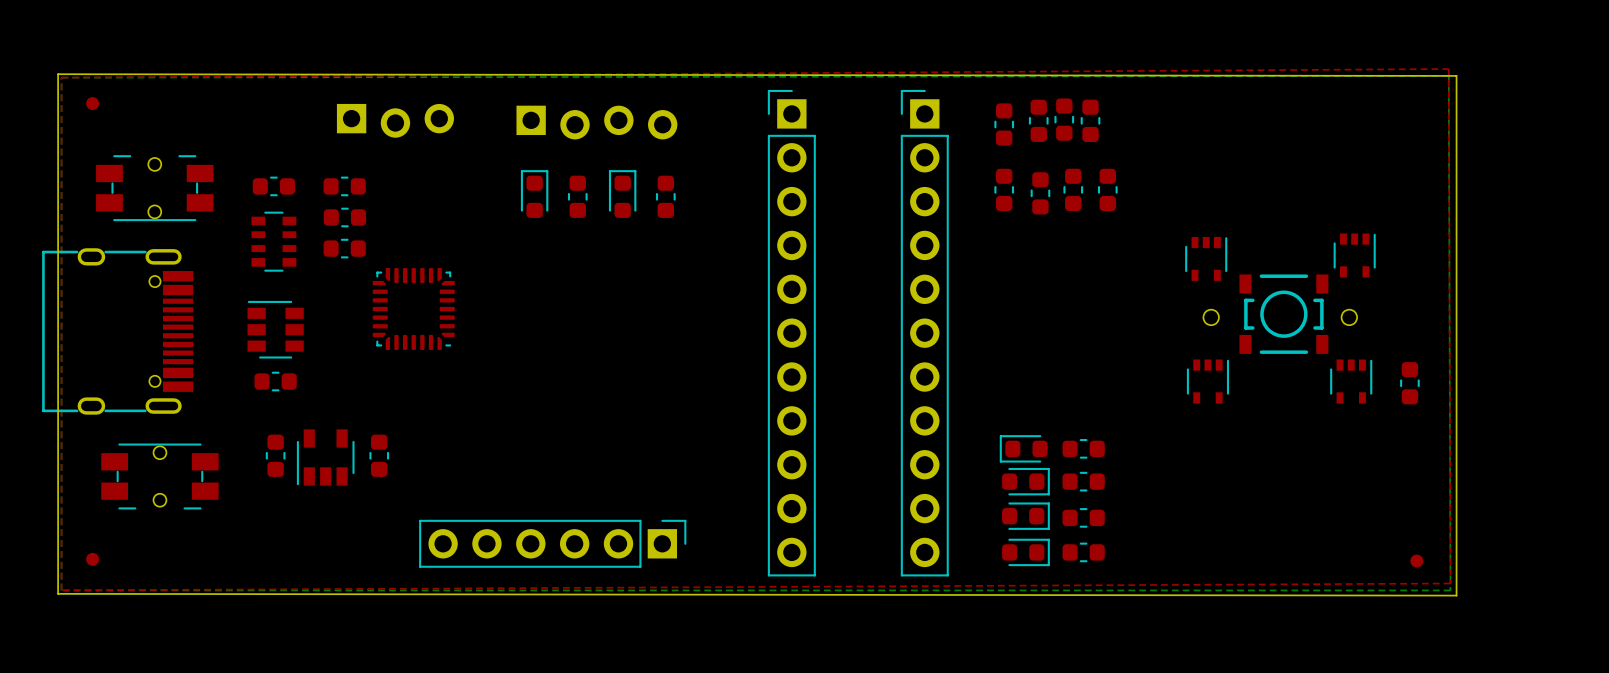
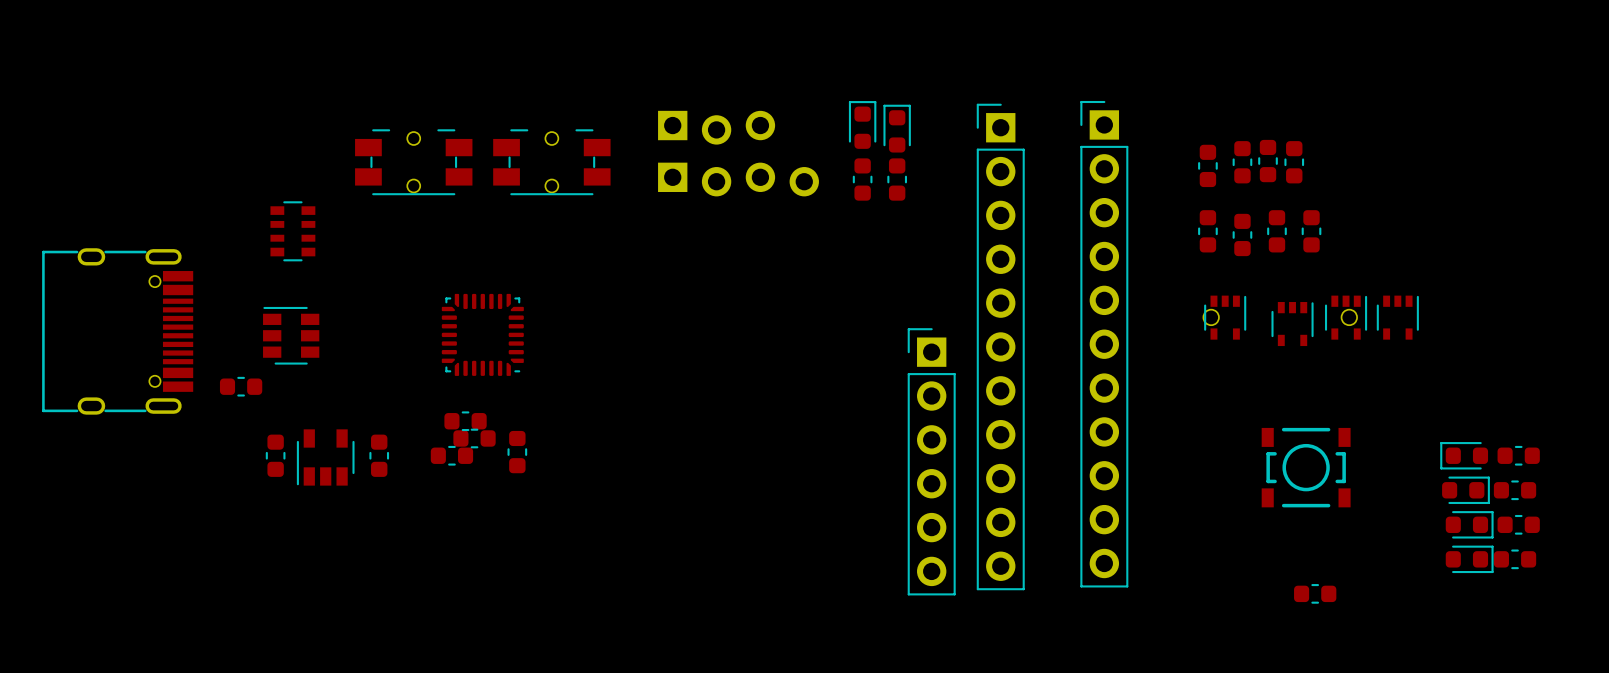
top zone outline: (1448, 69) (61, 77) (61, 590) (1450, 583) (1448, 69) -> none
board edge: (58, 74) (1456, 75) (1456, 595) (58, 593) (58, 74) -> none
bottom zone outline: (1448, 75) (61, 77) (61, 590) (1450, 590) (1448, 75) -> none
part: (92, 103) -> none
part: (1064, 119) -> none
part position: (395, 120) -> (716, 127)
part: (1038, 120) -> none
part: (1090, 120) -> none
part position: (596, 122) -> (738, 179)
part: none -> (862, 124)
part: (1004, 124) -> none
part: none -> (897, 128)
part: none -> (1268, 161)
part: none -> (413, 162)
part: none -> (551, 162)
part: none -> (1242, 162)
part: none -> (1294, 162)
part: none -> (1207, 165)
part: none -> (862, 179)
part: none -> (897, 179)
part: (273, 186) -> none
part: (344, 186) -> none
part: (154, 188) -> none
part: (1004, 189) -> none
part: (1073, 189) -> none
part: (1107, 189) -> none
part: (1040, 193) -> none
part: (534, 194) -> none
part: (622, 194) -> none
part: (577, 196) -> none
part: (665, 196) -> none
part: (344, 217) -> none
part: none -> (1207, 231)
part: none -> (1276, 231)
part: none -> (1311, 231)
part: none -> (1242, 234)
part position: (273, 241) -> (292, 231)
part: (344, 248) -> none
part: (1354, 255) -> none
part: (1206, 258) -> none
part footprint: [1239, 274, 1329, 354] -> [1271, 302, 1314, 347]
part position: (413, 309) -> (482, 334)
part: none -> (1225, 317)
part: none -> (1346, 317)
part: none -> (1397, 317)
part position: (275, 329) -> (291, 335)
part: (791, 333) -> none
part position: (924, 333) -> (1000, 346)
part: none -> (1104, 344)
part position: (275, 381) -> (241, 386)
part: (1207, 381) -> none
part: (1351, 381) -> none
part: (1409, 383) -> none
part: none -> (465, 421)
part: none -> (474, 438)
part: (1023, 448) -> none
part: (1083, 448) -> none
part: none -> (517, 452)
part: none -> (451, 455)
part: none -> (1464, 455)
part: none -> (1518, 455)
part: none -> (1306, 467)
part: (159, 476) -> none
part: (1025, 481) -> none
part: (1083, 481) -> none
part: none -> (1465, 490)
part: none -> (1515, 490)
part: (1025, 516) -> none
part: (1083, 517) -> none
part: none -> (1469, 524)
part: none -> (1518, 524)
part rotation: 0° (552, 543) -> 90° counterclockwise (931, 461)
part position: (552, 543) -> (931, 461)
part: (1025, 552) -> none
part: (1083, 552) -> none
part: (92, 559) -> none
part: none -> (1469, 559)
part: none -> (1515, 559)
part: (1416, 561) -> none
part: none -> (1315, 593)

